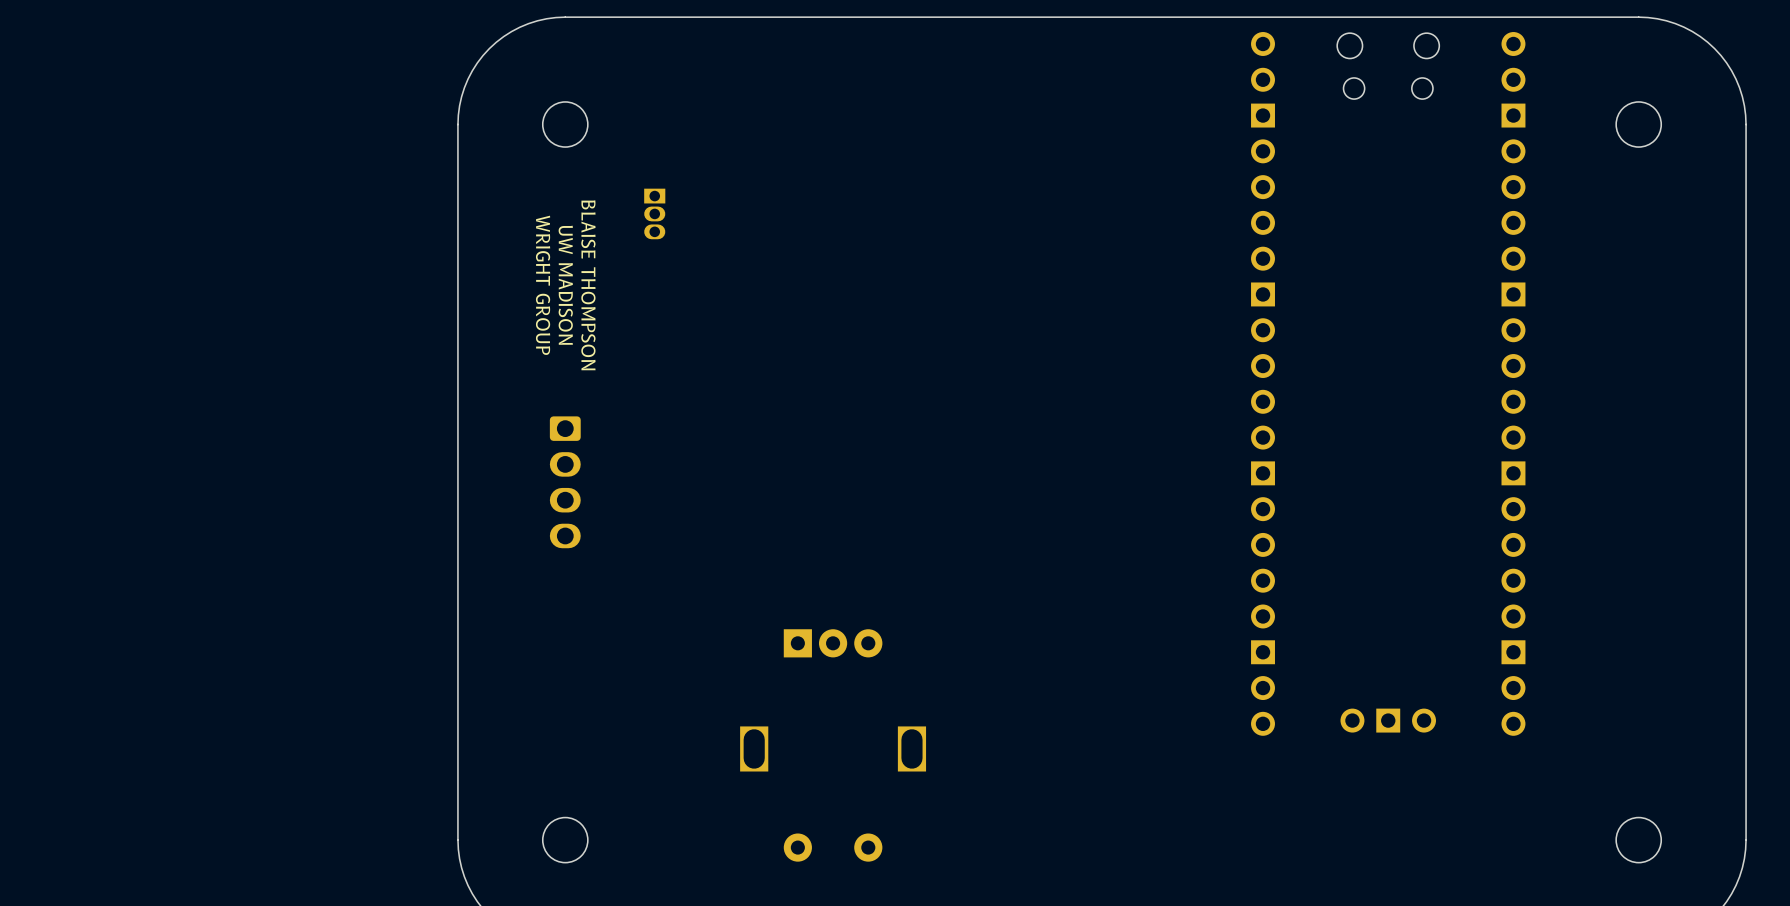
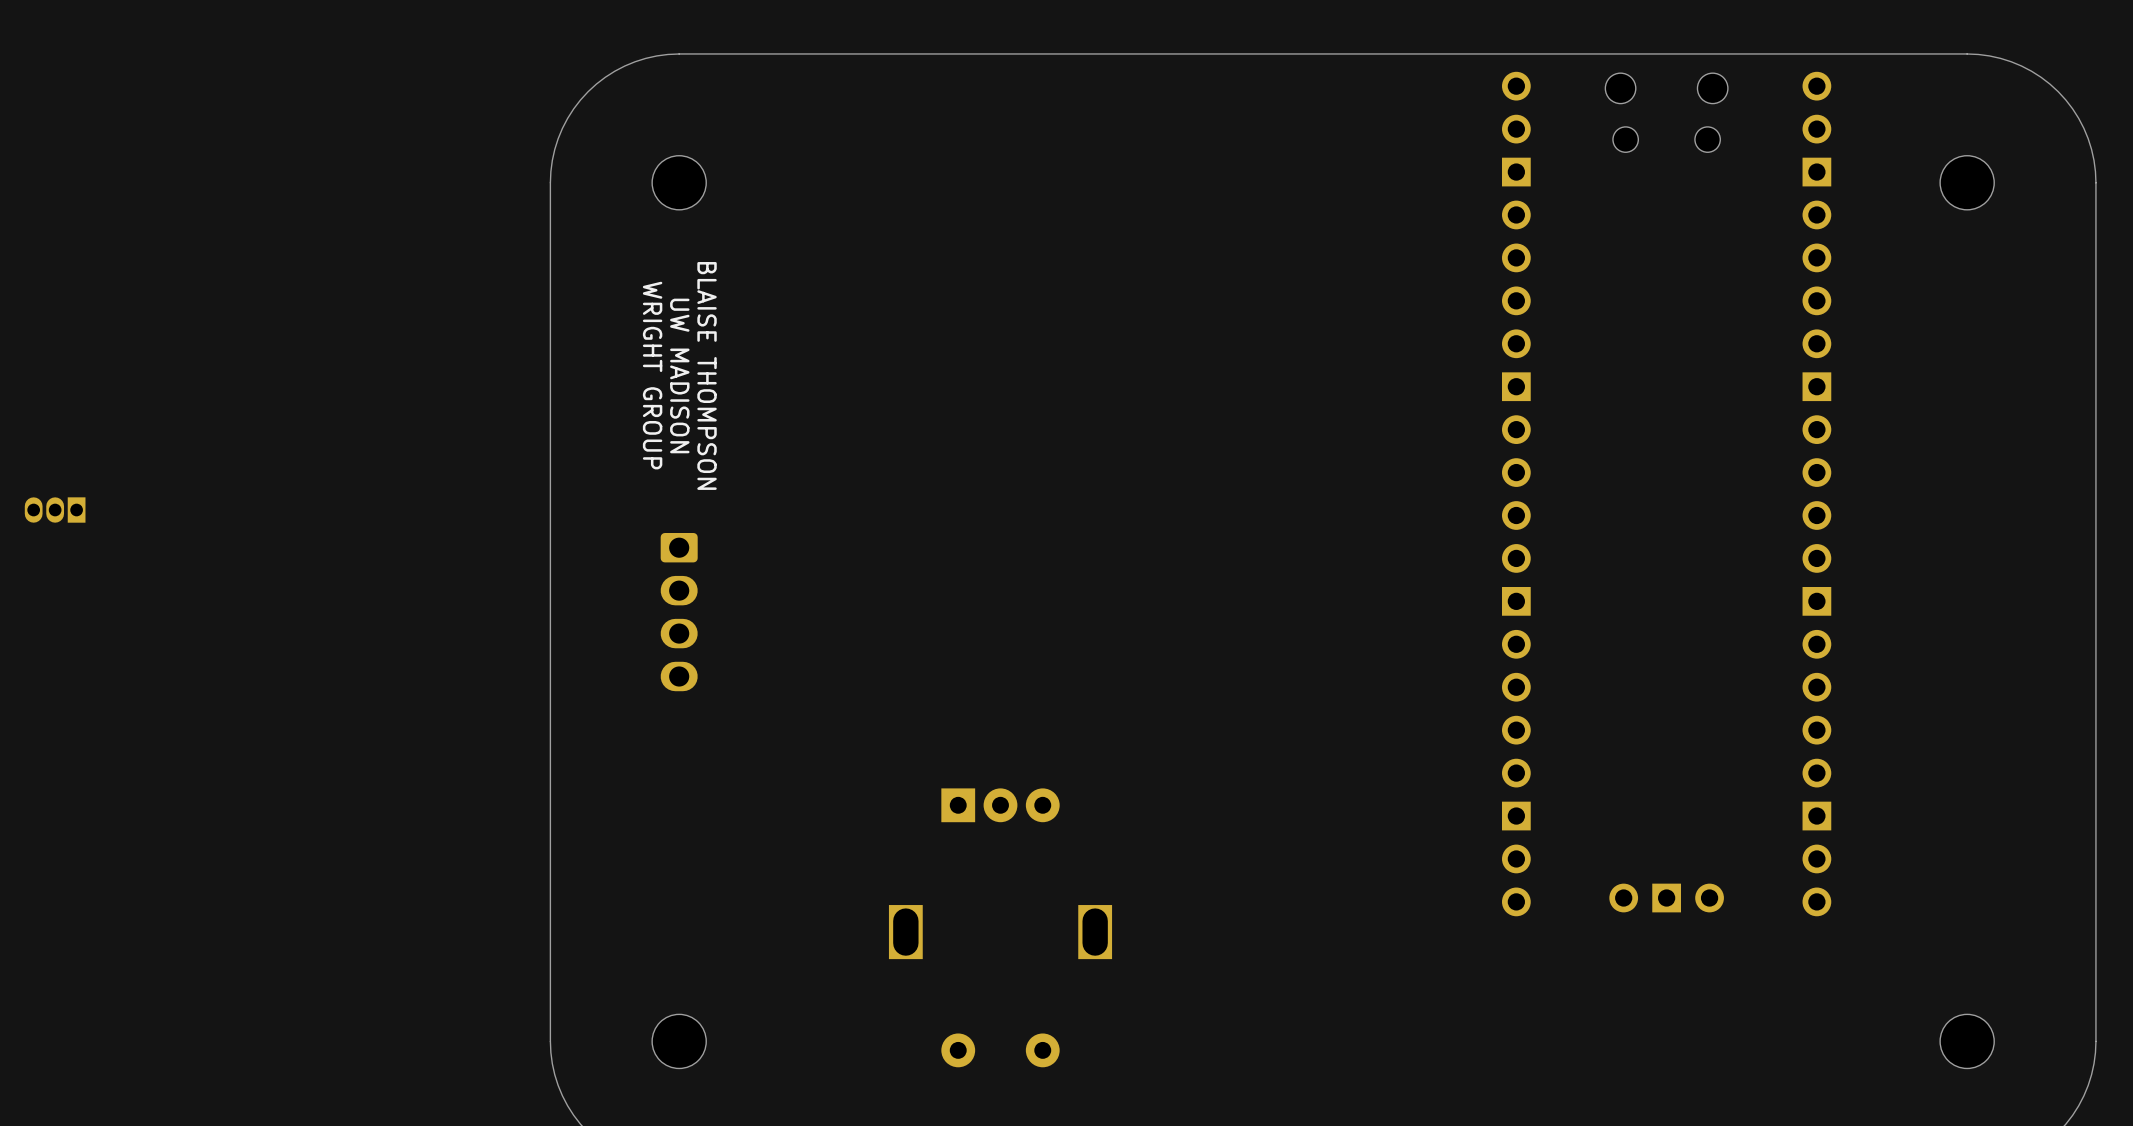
part: (654, 213) -> none
part: none -> (55, 510)

